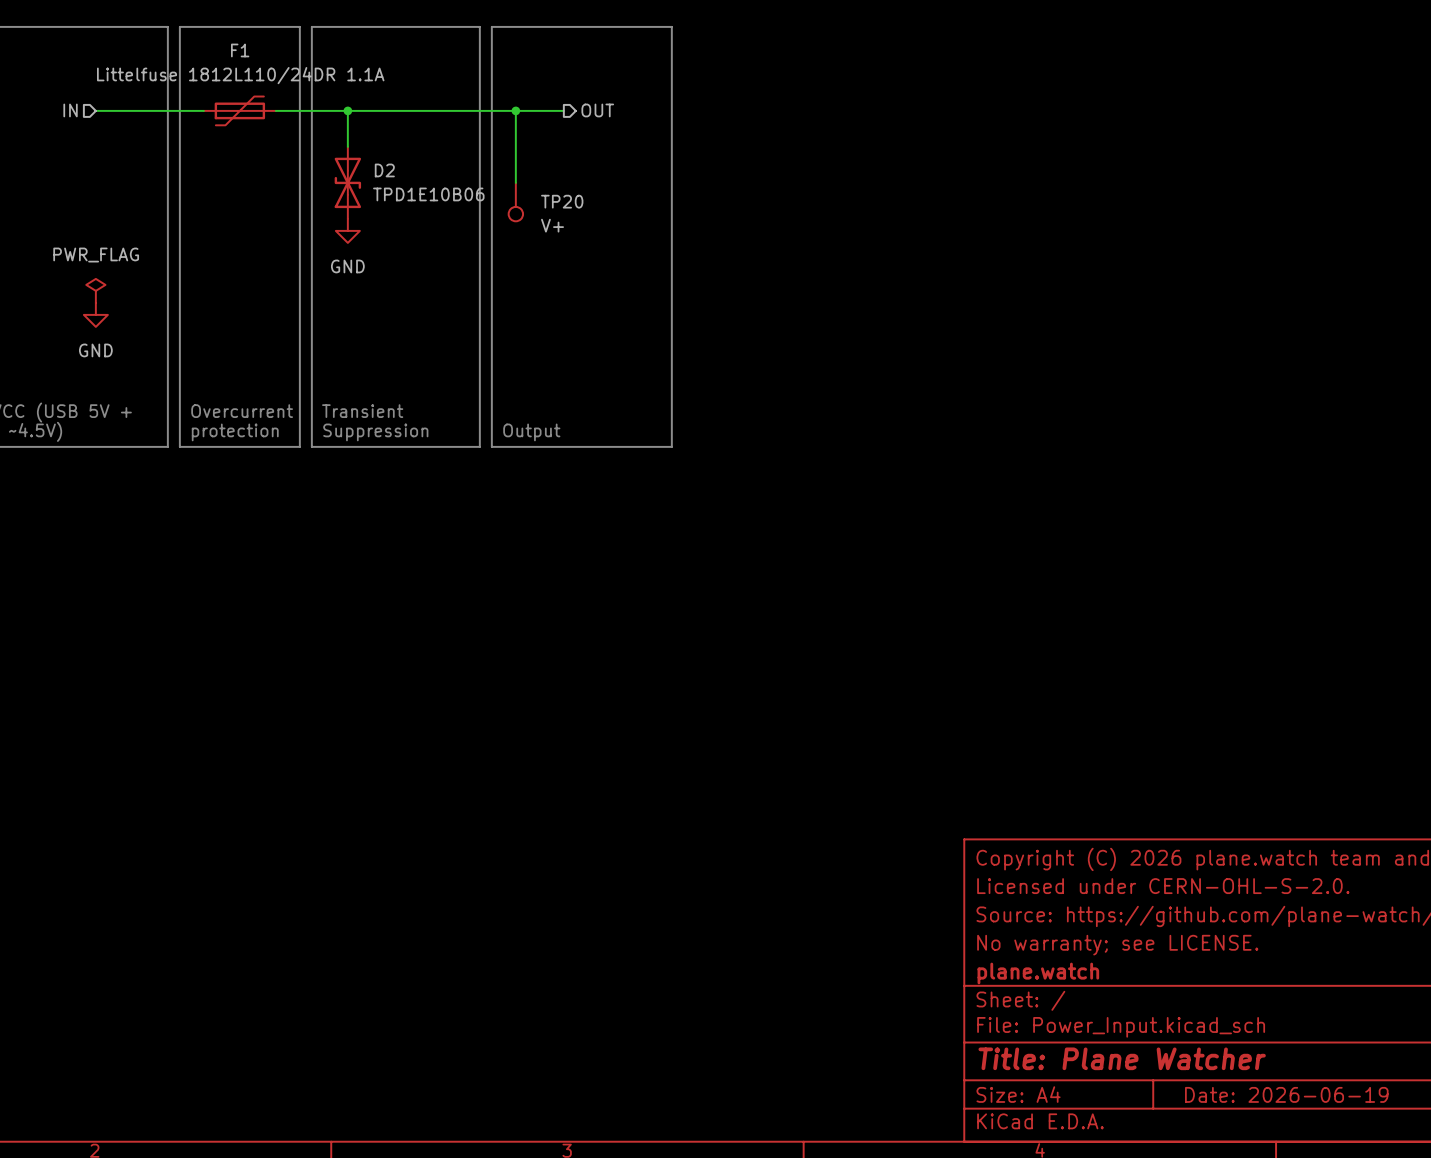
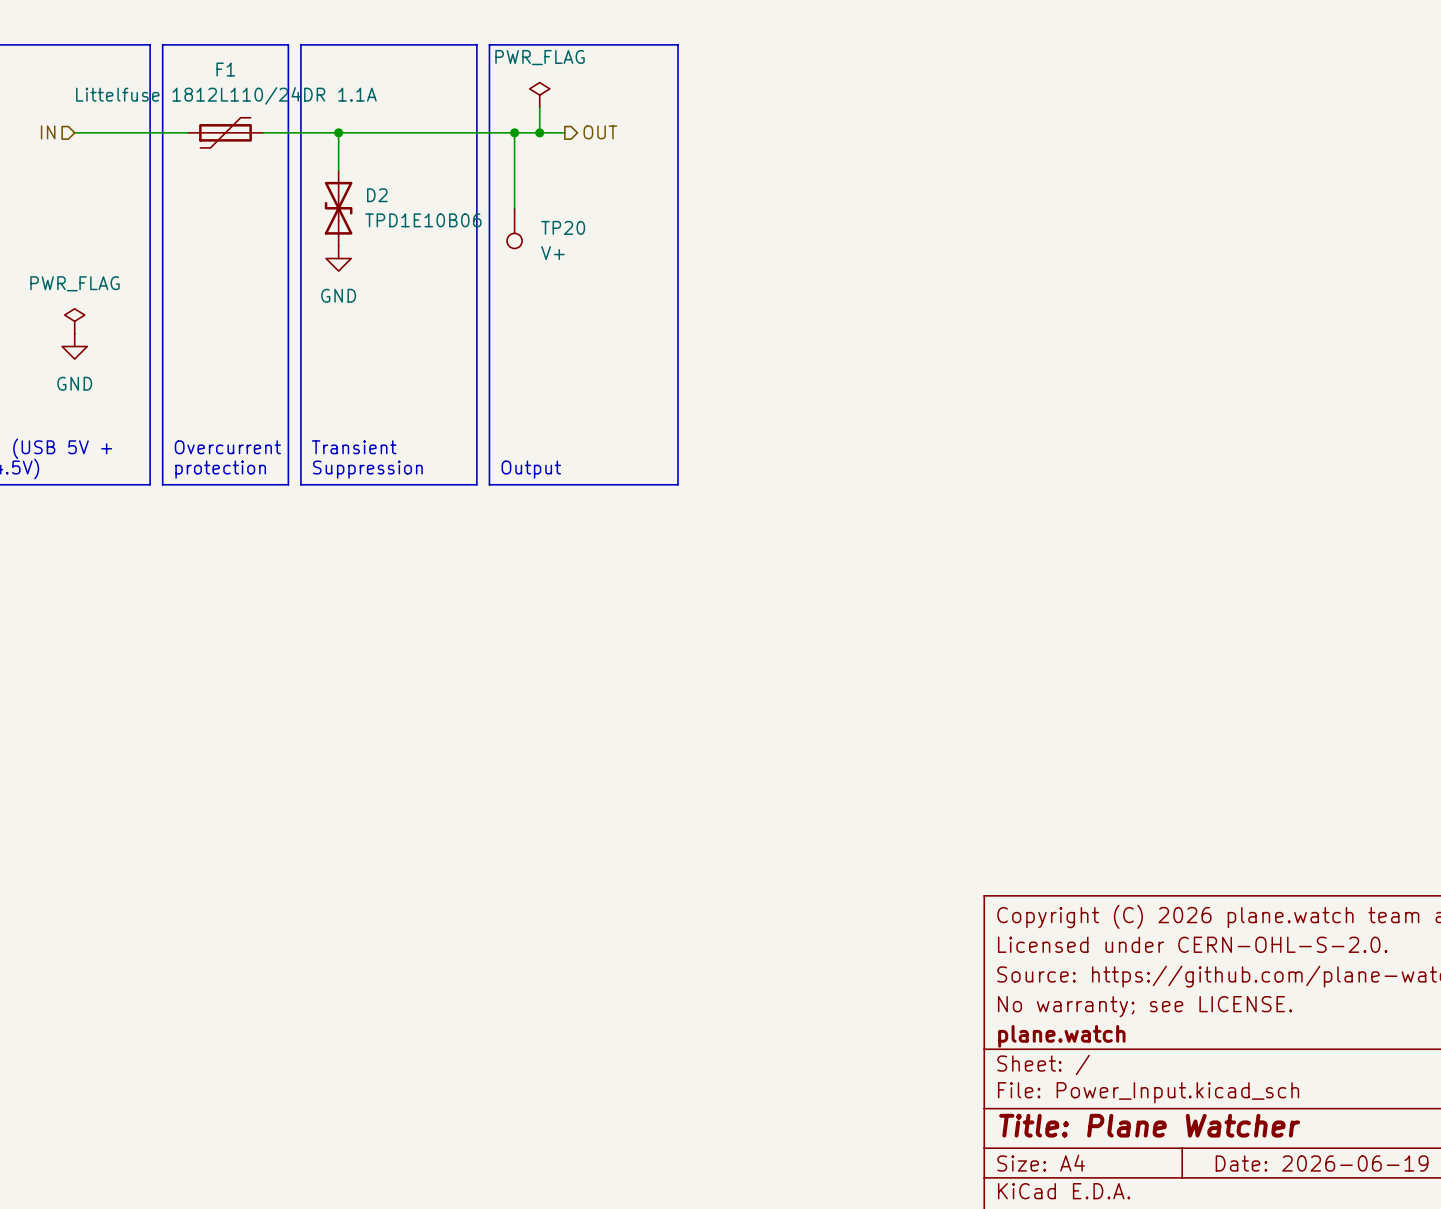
power symbol: none -> PWR_FLAG (539, 95)
wire: none -> (539, 107) (539, 132)
junction: none -> (539, 132)

